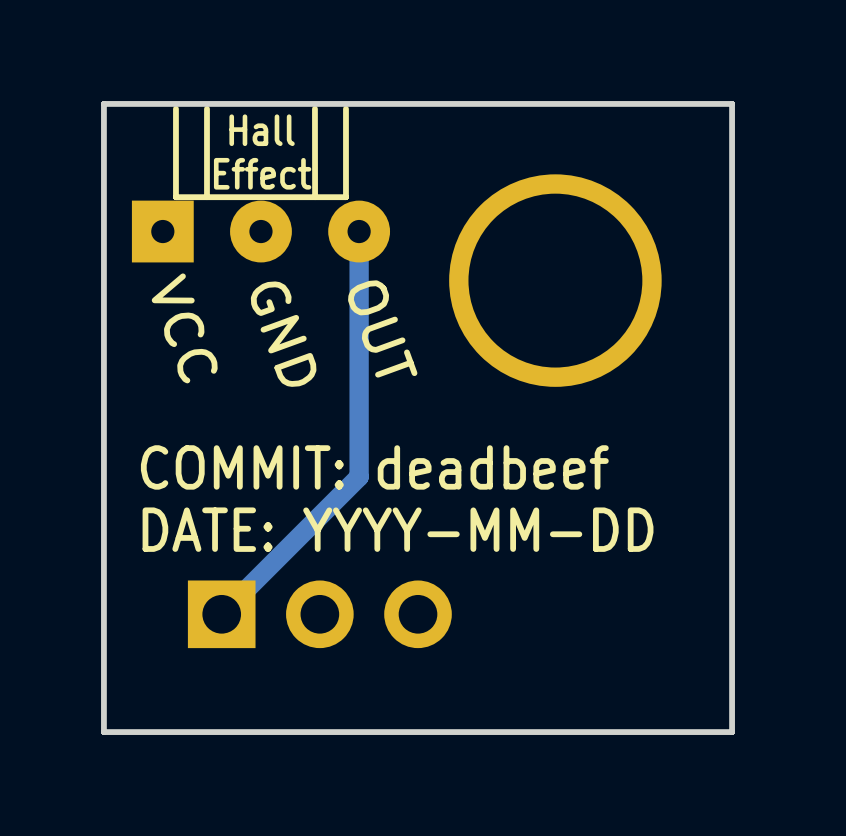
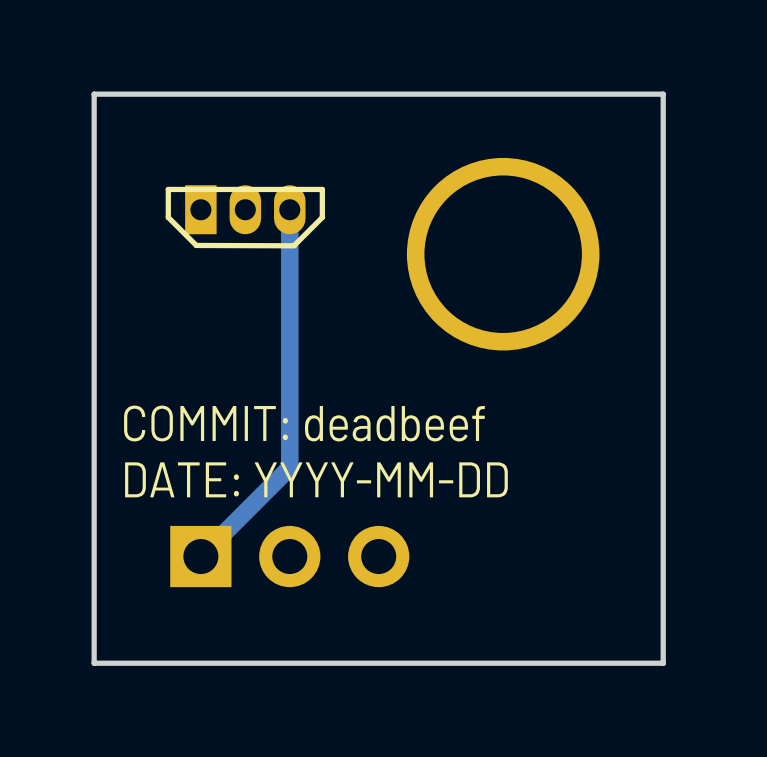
text: Hall (262, 130) -> none
text: Effect (262, 173) -> none
part: (260, 184) -> none
track: (359, 231) (359, 476) (319, 516) -> (289, 209) (289, 467)
part: none -> (245, 216)
text: VCC (184, 328) -> none
text: OUT (382, 328) -> none
text: GND (283, 334) -> none

